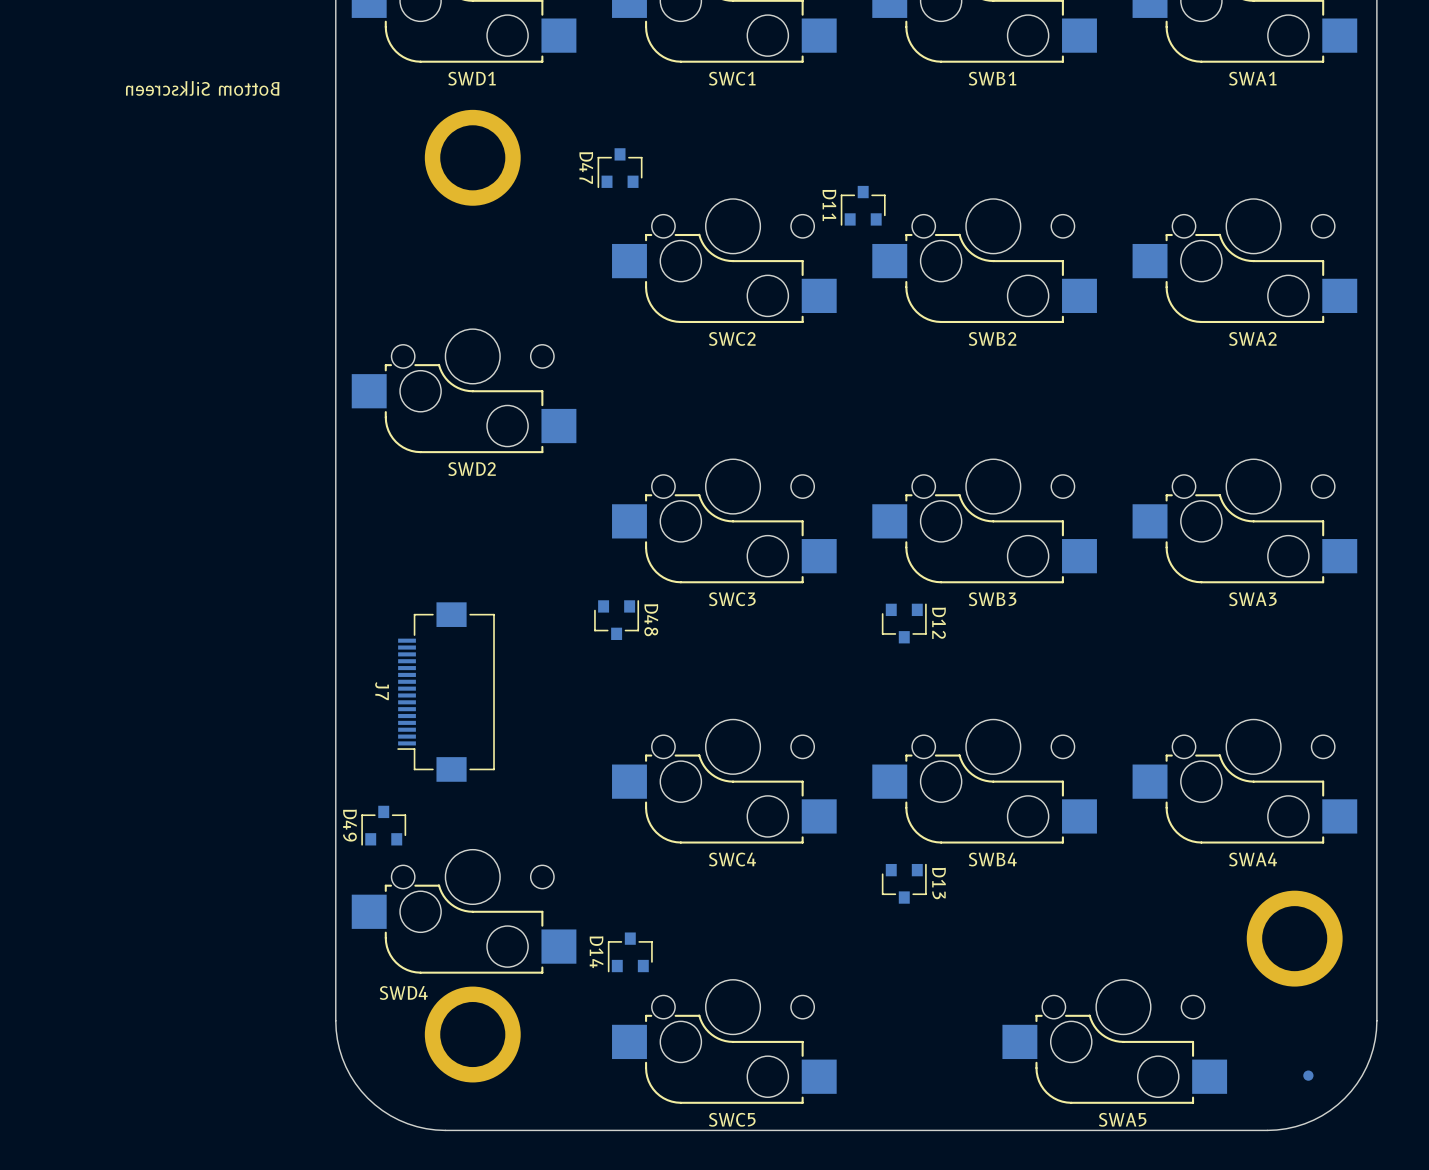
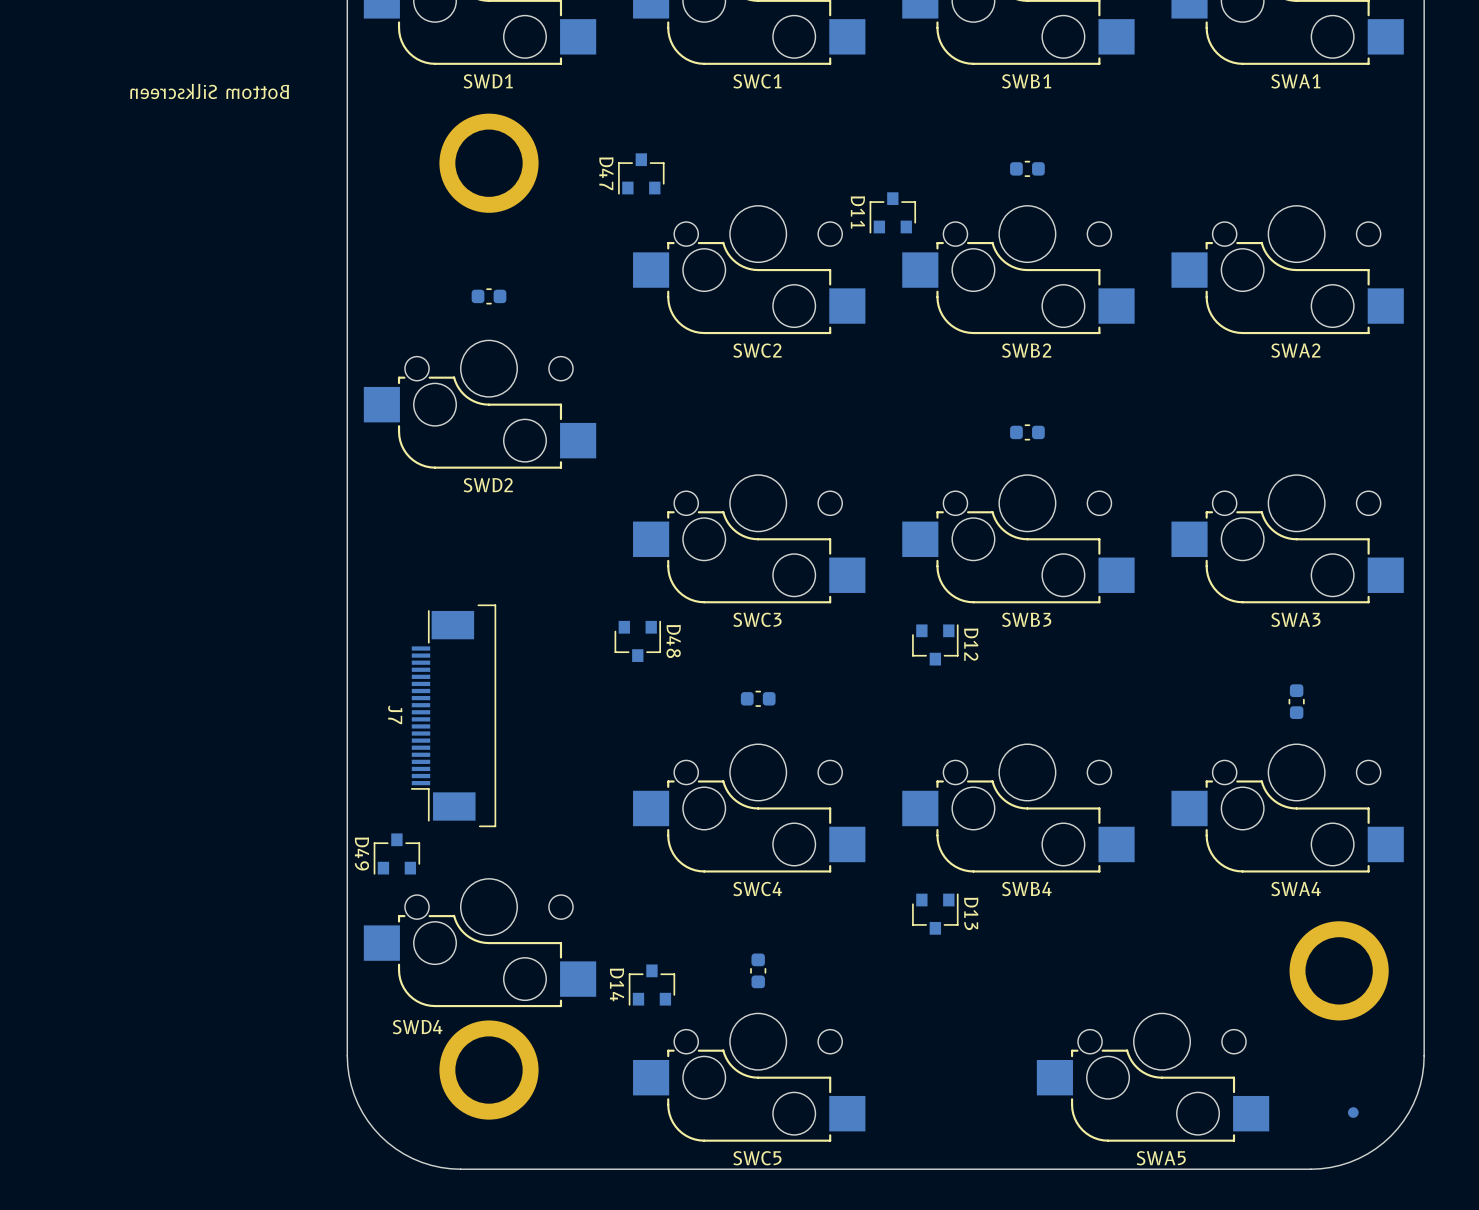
part: none -> (1027, 168)
part: none -> (489, 296)
part: none -> (1027, 432)
J7 footprint: [397, 602, 495, 782] -> [410, 604, 497, 828]
part: none -> (758, 698)
part: none -> (1296, 701)
part: none -> (758, 970)

